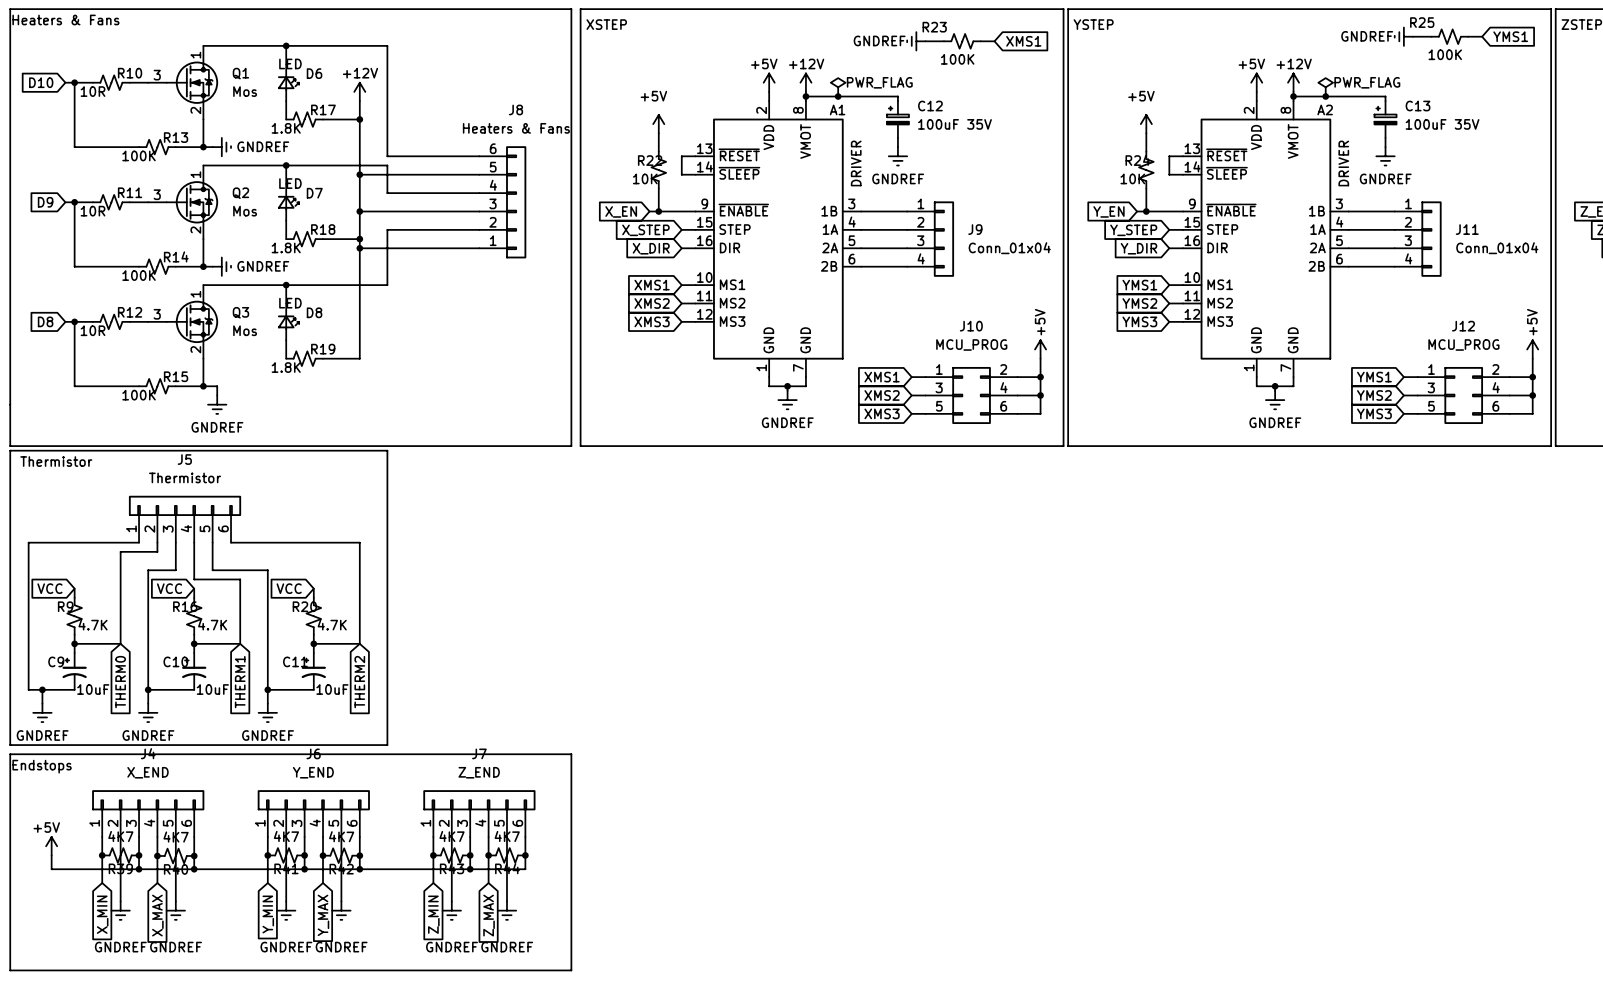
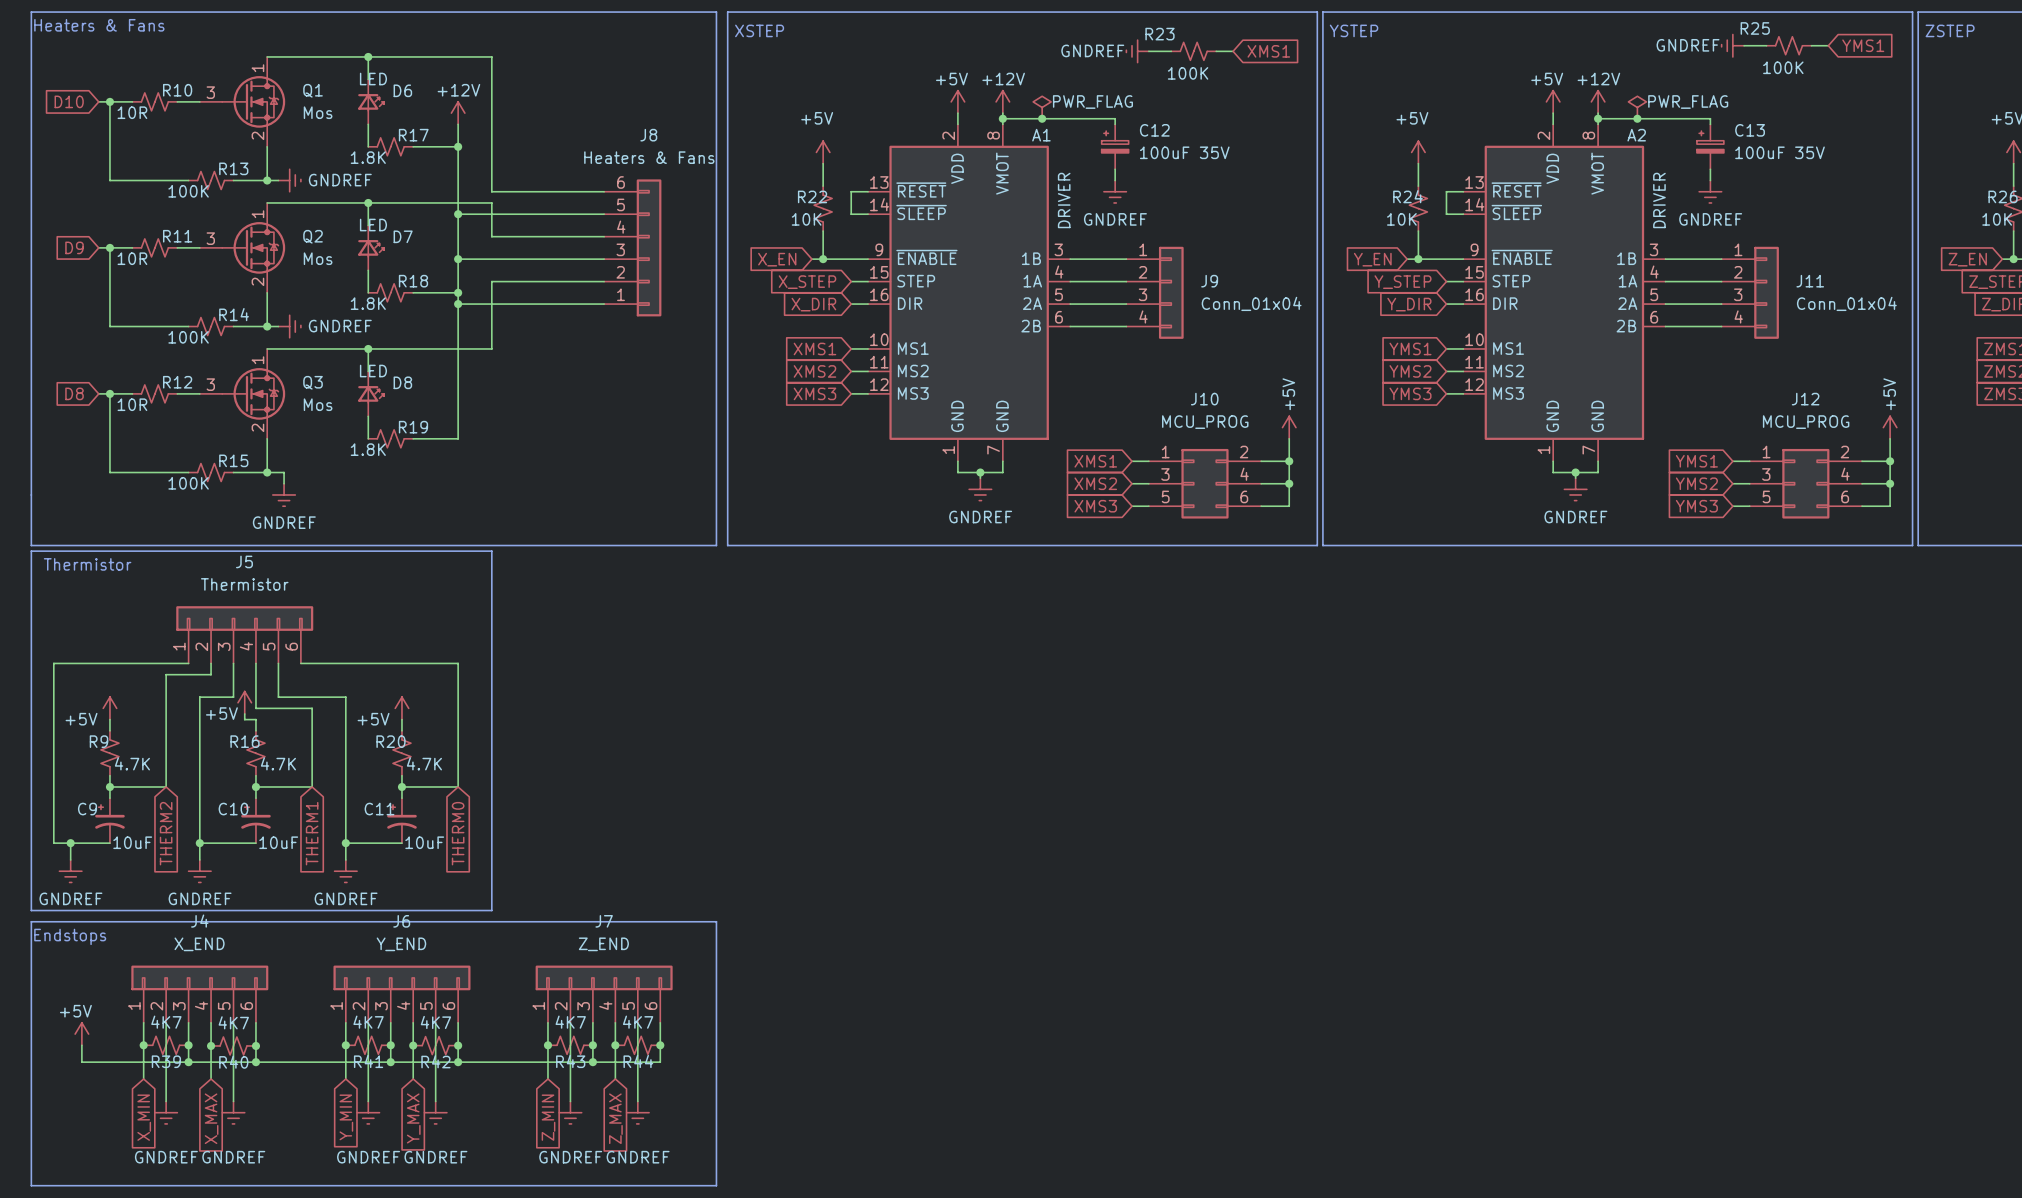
power symbol: none -> +5V (244, 702)
power symbol: none -> +5V (109, 708)
power symbol: none -> +5V (401, 708)
wire: none -> (244, 713) (244, 719) (255, 719)
global label: VCC (49, 588) -> none
global label: VCC (169, 588) -> none
global label: VCC (289, 588) -> none
global label: THERM0 (120, 682) -> THERM2 (166, 833)
global label: THERM2 (359, 682) -> THERM0 (458, 833)

